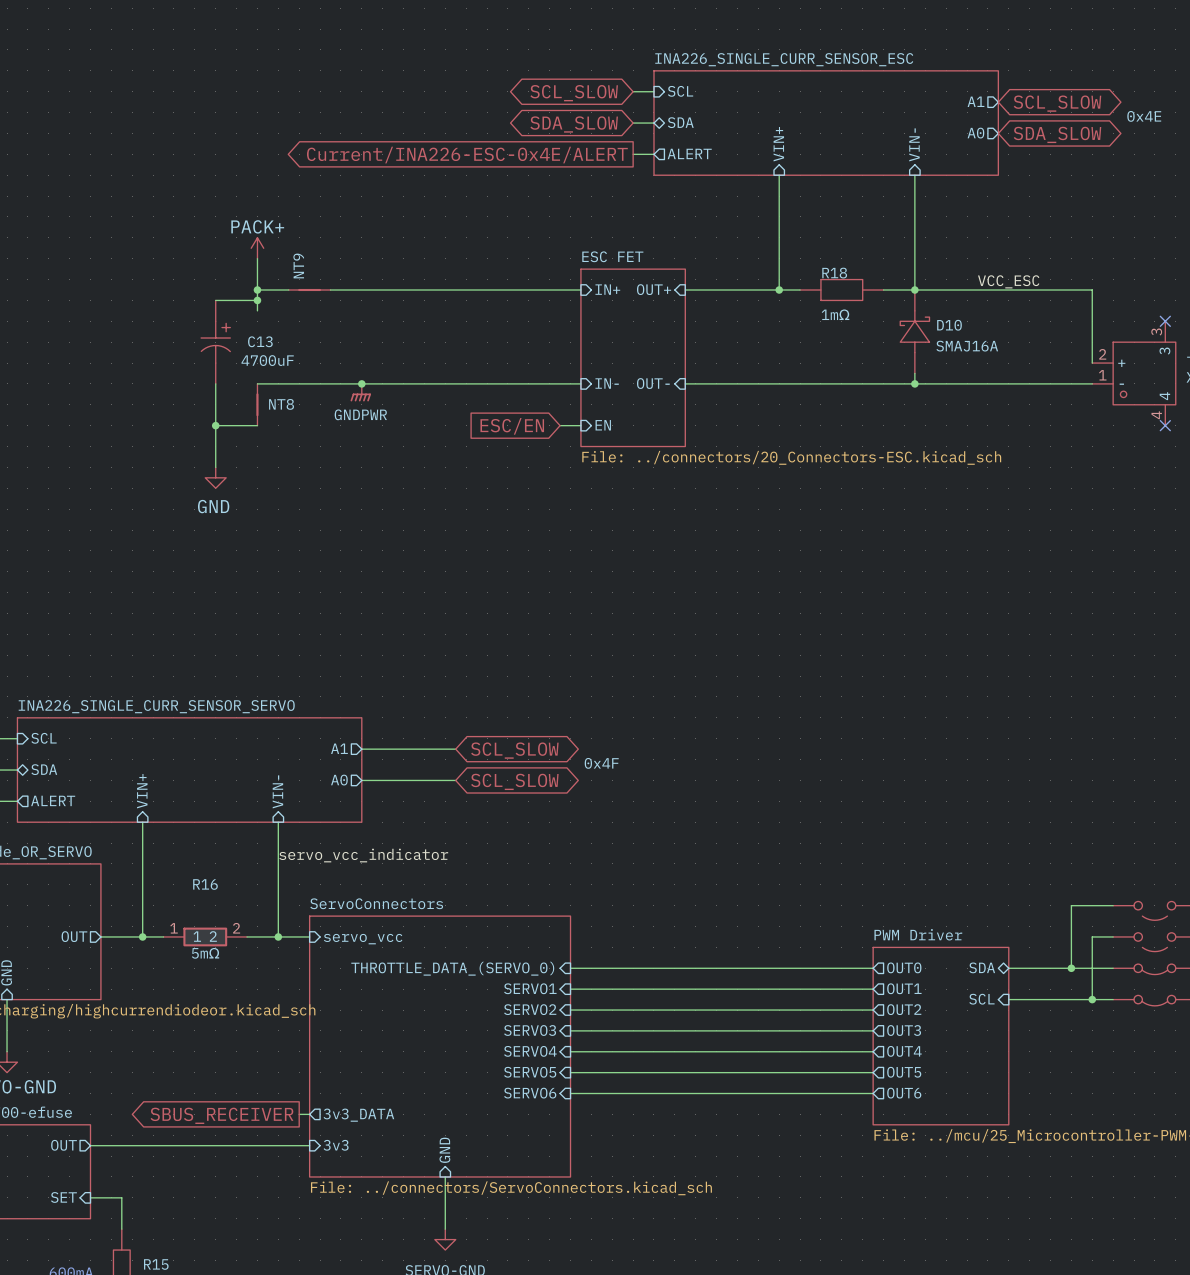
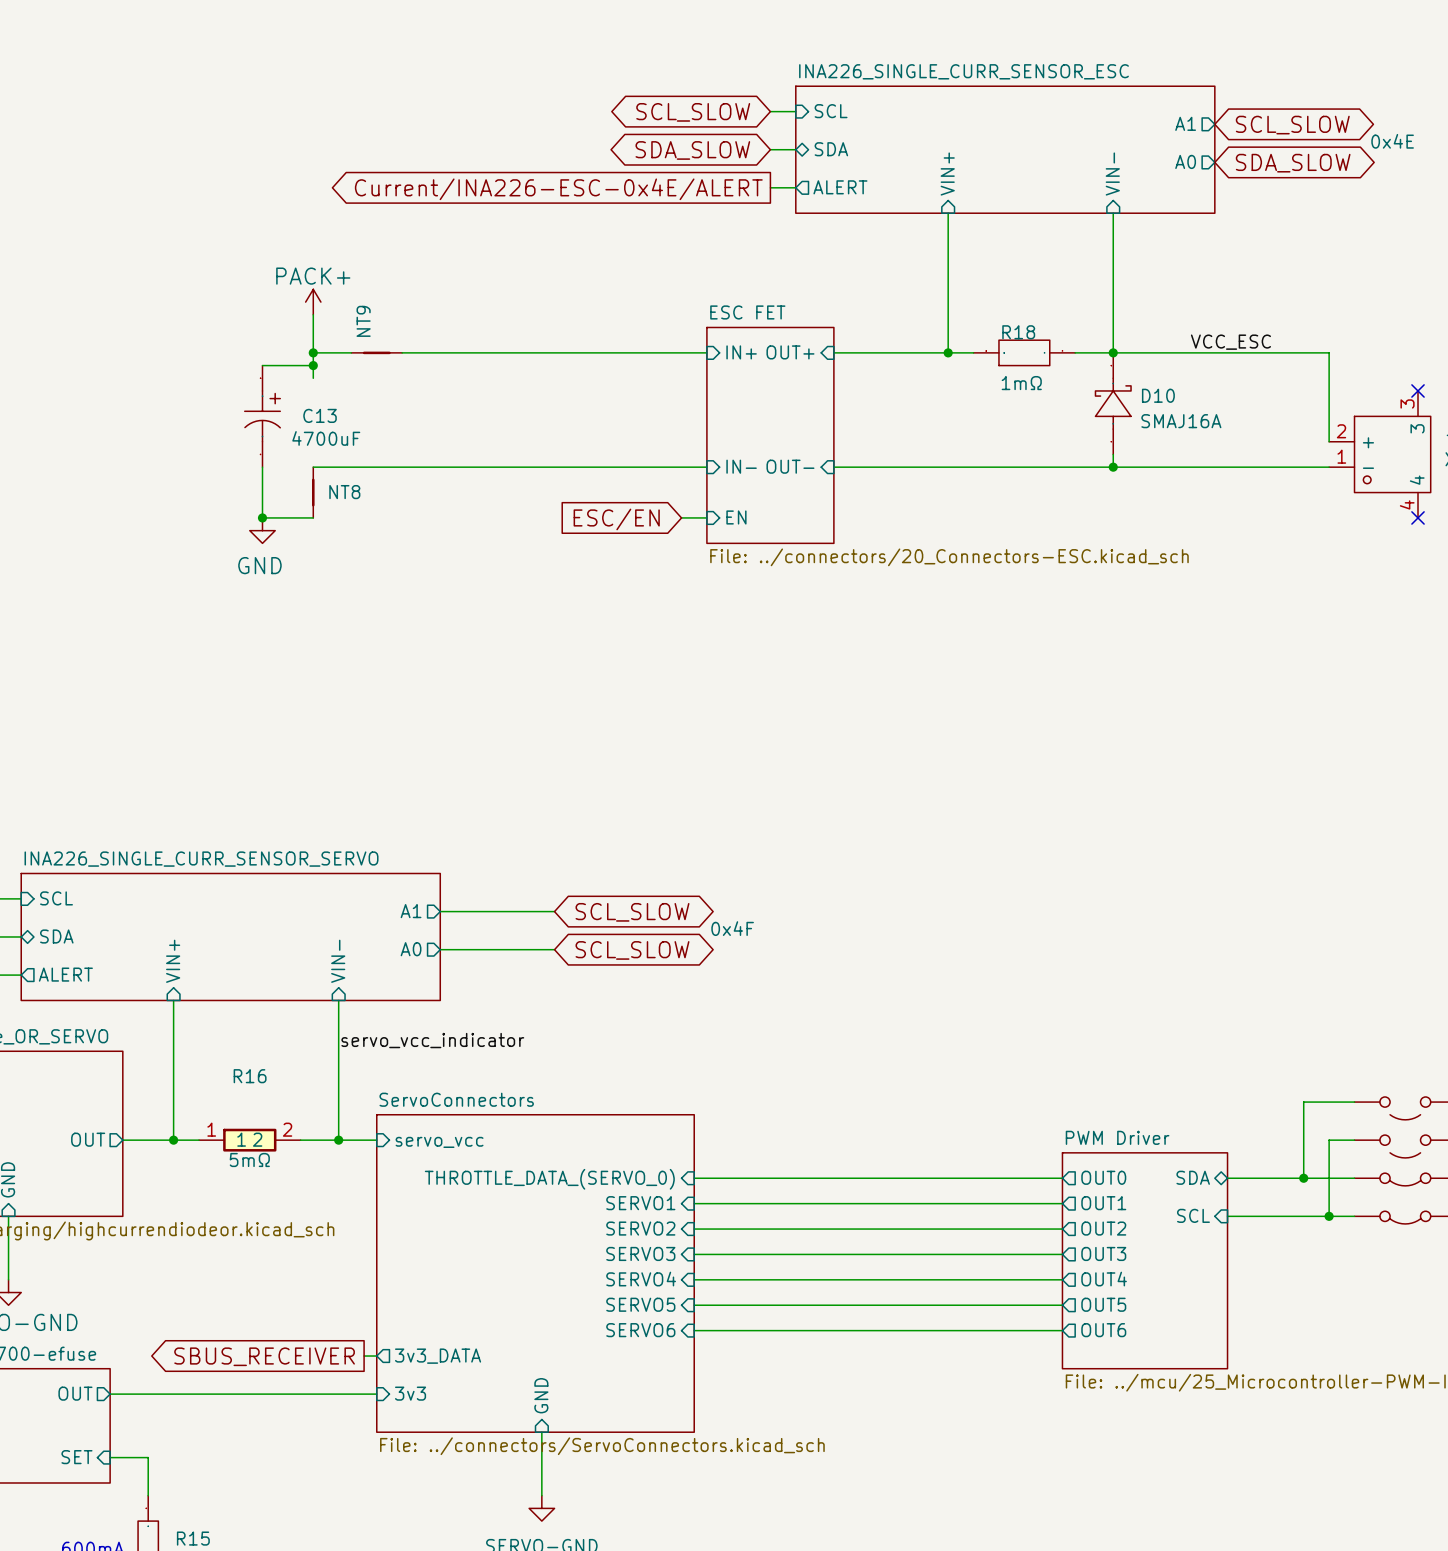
junction: (361, 383) -> none
power symbol: GNDPWR (360, 392) -> none
wire: (215, 425) (215, 467) -> none
power symbol position: GND (215, 477) -> GND (262, 530)

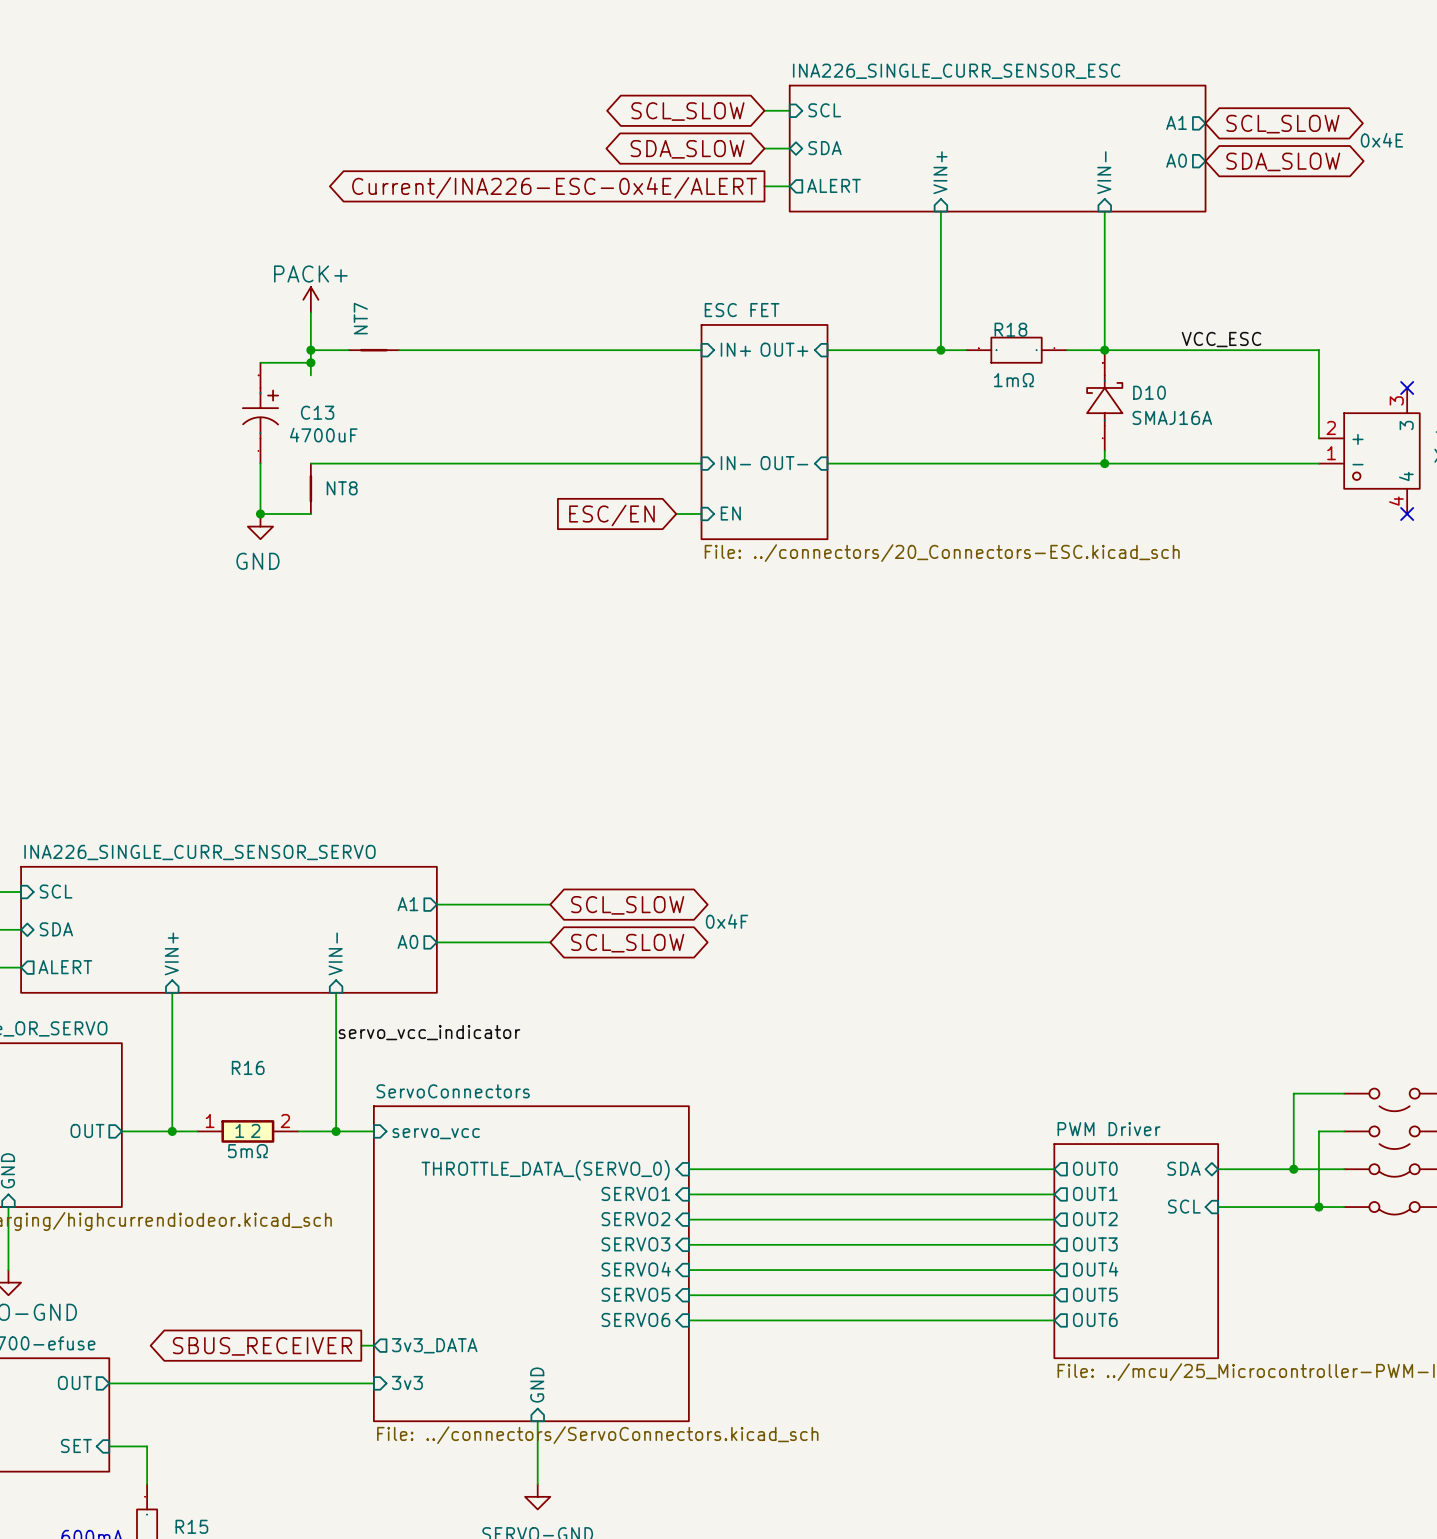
NT9 name: NT9 (363, 321) -> NT7 (360, 318)

